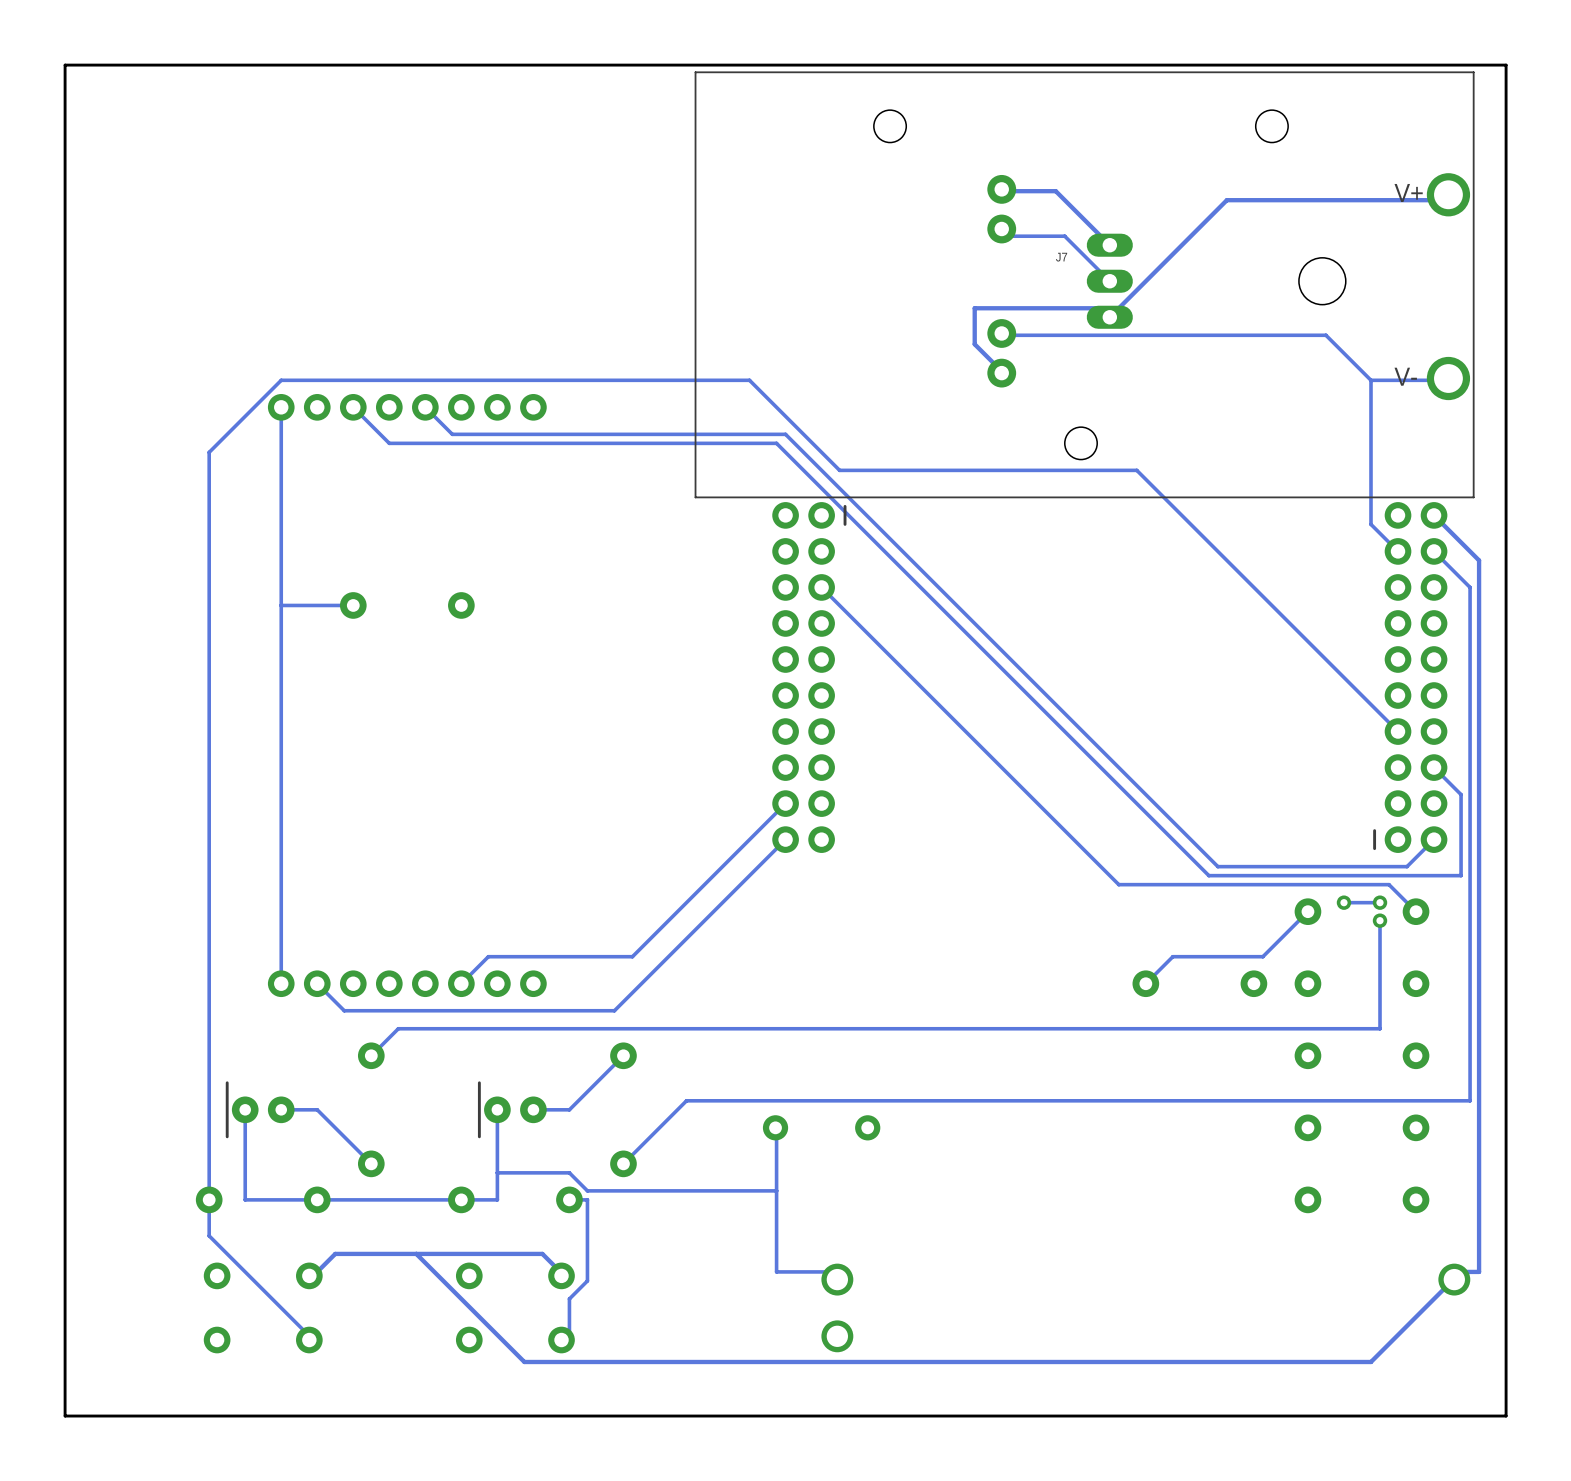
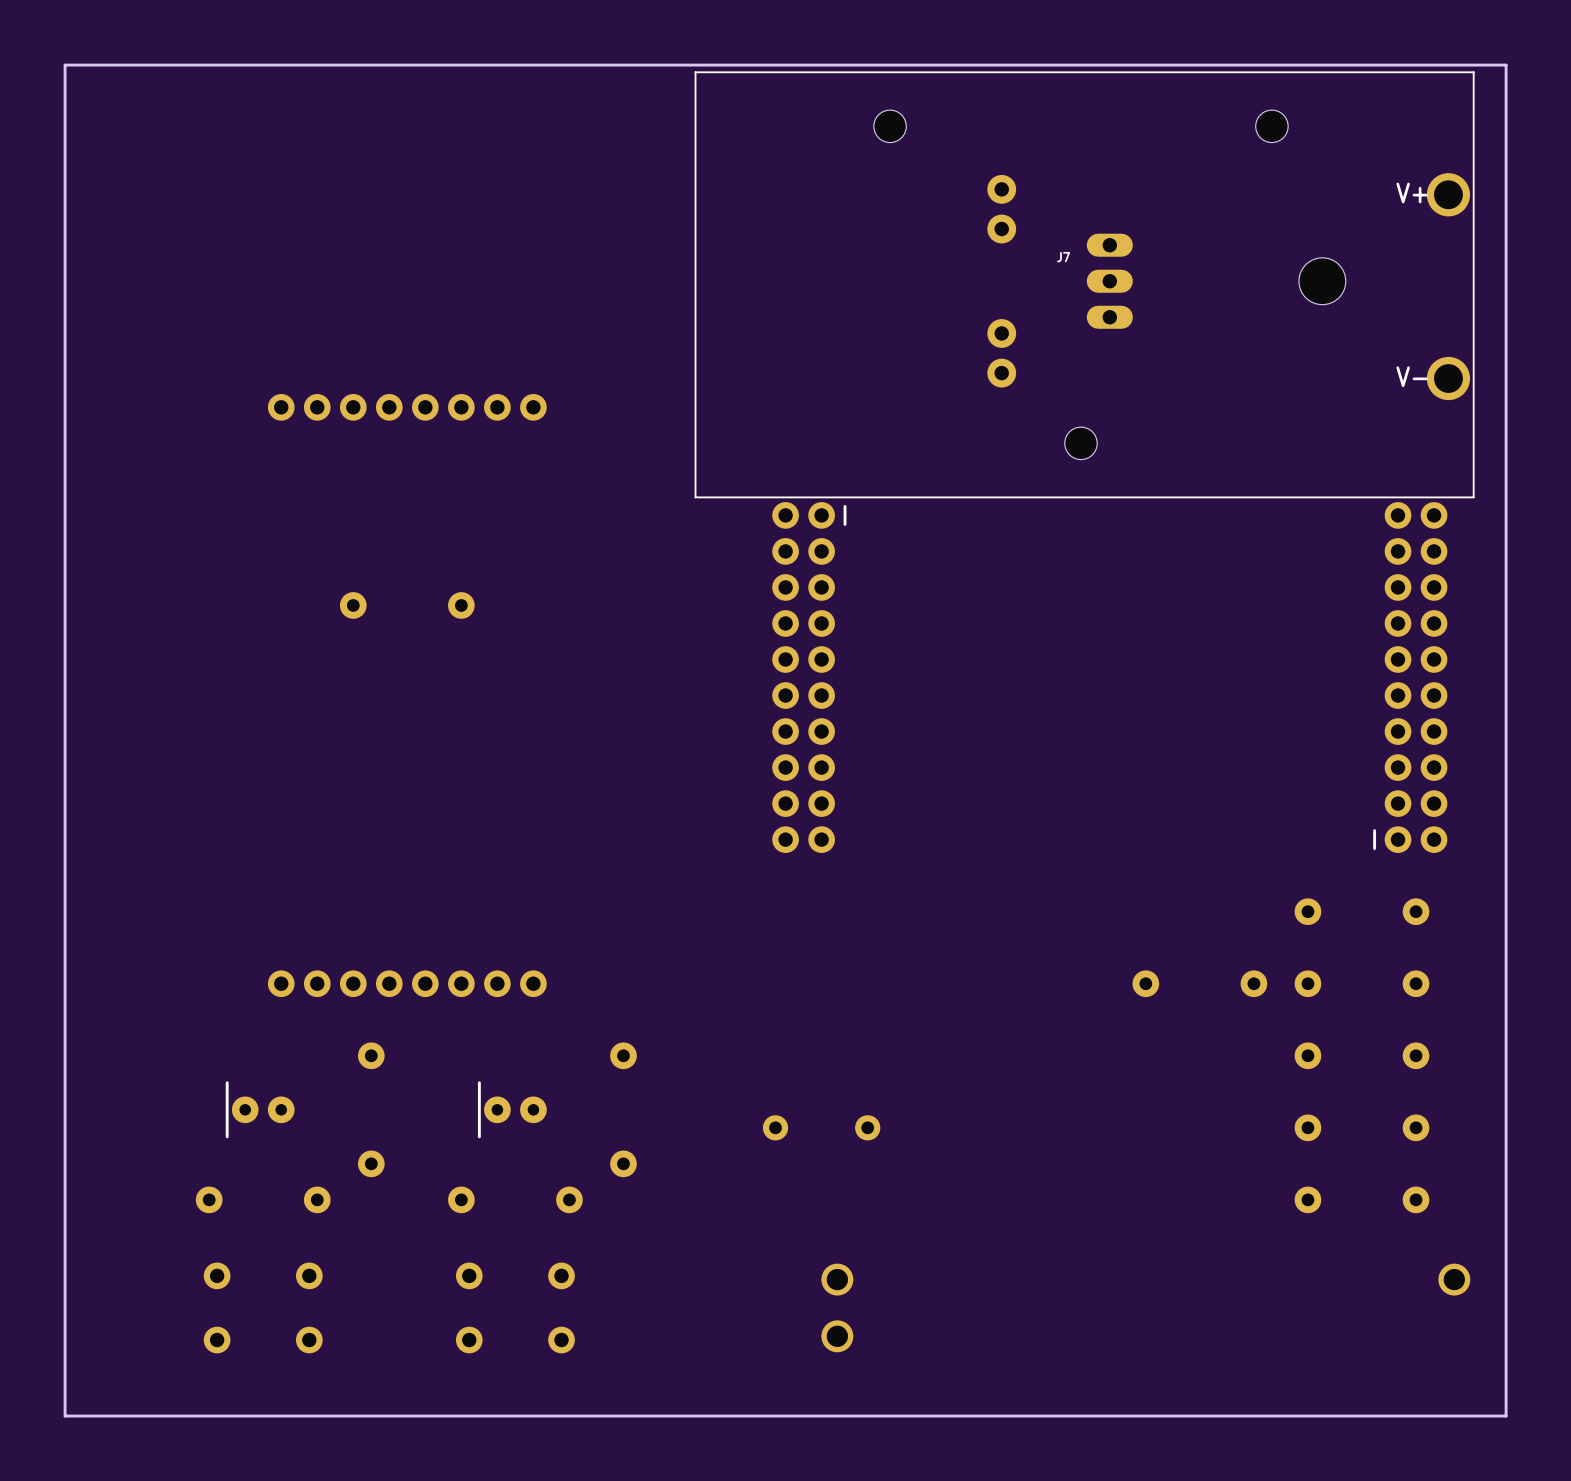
track: (1001, 189) (1001, 191) (1055, 191) (1109, 245) -> none
track: (1448, 194) (1443, 200) (1226, 200) (1109, 317) -> none
track: (1001, 229) (1001, 236) (1064, 236) (1109, 281) -> none
track: (1118, 308) (974, 308) (974, 344) (1001, 373) -> none
track: (1001, 333) (1001, 335) (1325, 335) (1371, 380) -> none
track: (1448, 378) (1443, 380) (1371, 380) -> none
track: (1371, 380) (1371, 524) (1398, 551) -> none
track: (281, 407) (281, 983) -> none
track: (353, 407) (389, 443) (776, 443) (1208, 875) (1461, 875) (1461, 794) (1434, 767) -> none
track: (425, 407) (452, 434) (785, 434) (1217, 866) (1407, 866) (1434, 839) -> none
track: (1434, 515) (1479, 560) (1479, 1271) (1461, 1271) (1371, 1361) (524, 1361) (416, 1253) -> none
track: (1434, 551) (1470, 587) (1470, 1100) (686, 1100) (623, 1163) -> none
track: (821, 587) (1118, 884) (1389, 884) (1416, 911) -> none
track: (353, 605) (281, 605) -> none
track: (1398, 731) (1136, 470) (839, 470) (749, 380) (281, 380) (209, 452) (209, 1235) (308, 1334) (309, 1340) -> none
track: (785, 803) (632, 956) (488, 956) (461, 983) -> none
track: (785, 839) (614, 1010) (344, 1010) (317, 983) -> none
via: (1343, 902) -> none
track: (1380, 902) (1343, 902) -> none
via: (1380, 902) -> none
track: (1307, 911) (1262, 956) (1172, 956) (1145, 983) -> none
track: (1380, 920) (1380, 1028) (398, 1028) (371, 1055) -> none
via: (1380, 920) -> none
track: (623, 1055) (569, 1109) (533, 1109) -> none
track: (281, 1109) (317, 1109) (371, 1163) -> none
track: (497, 1109) (497, 1199) (245, 1199) (245, 1109) -> none
track: (775, 1127) (776, 1271) (830, 1271) (837, 1279) -> none
track: (497, 1172) (569, 1172) (587, 1190) (776, 1190) -> none
track: (569, 1199) (587, 1199) (587, 1280) (569, 1298) (569, 1334) (561, 1340) -> none
track: (561, 1275) (560, 1271) (542, 1253) (335, 1253) (317, 1271) (309, 1275) -> none

